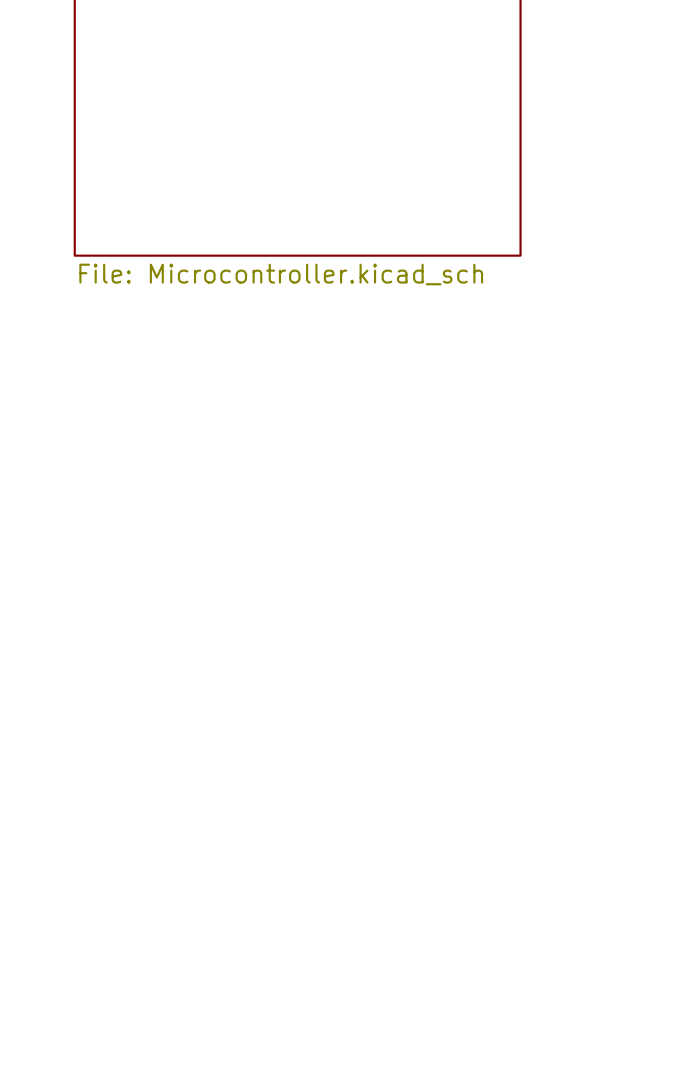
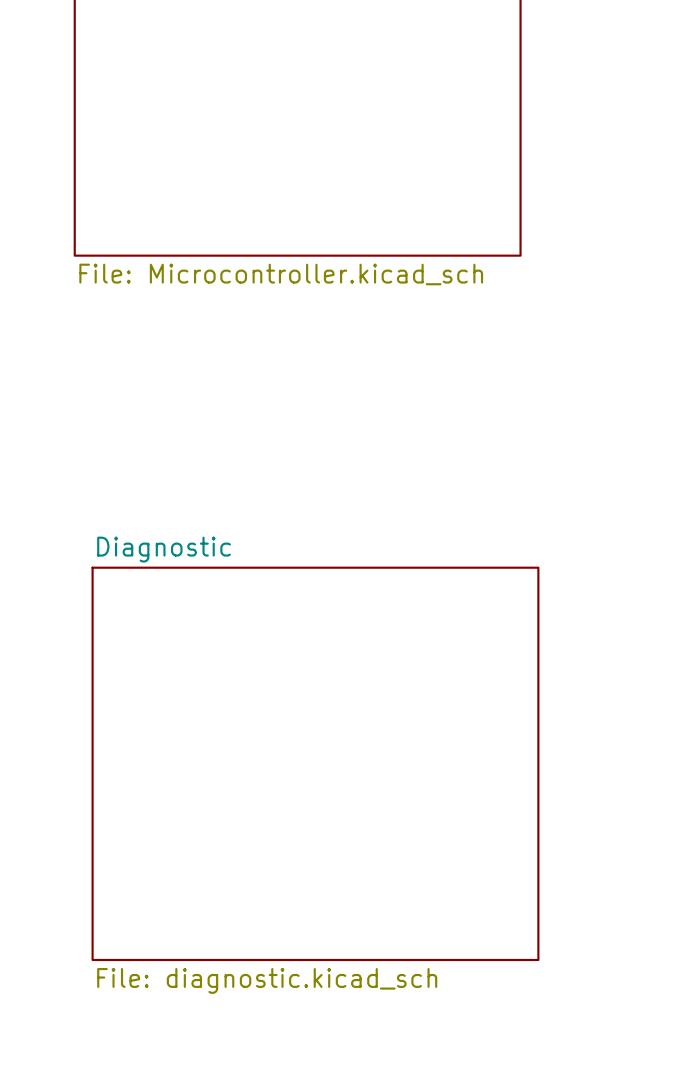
sheet Diagnostic: none -> File: diagnostic.kicad_sch (315, 763)

